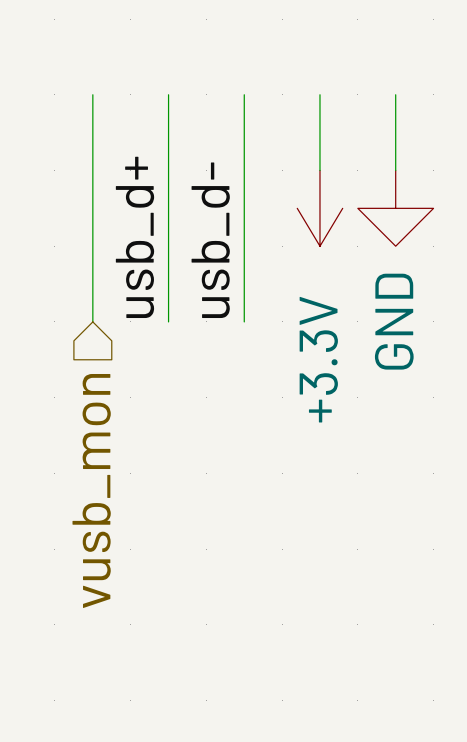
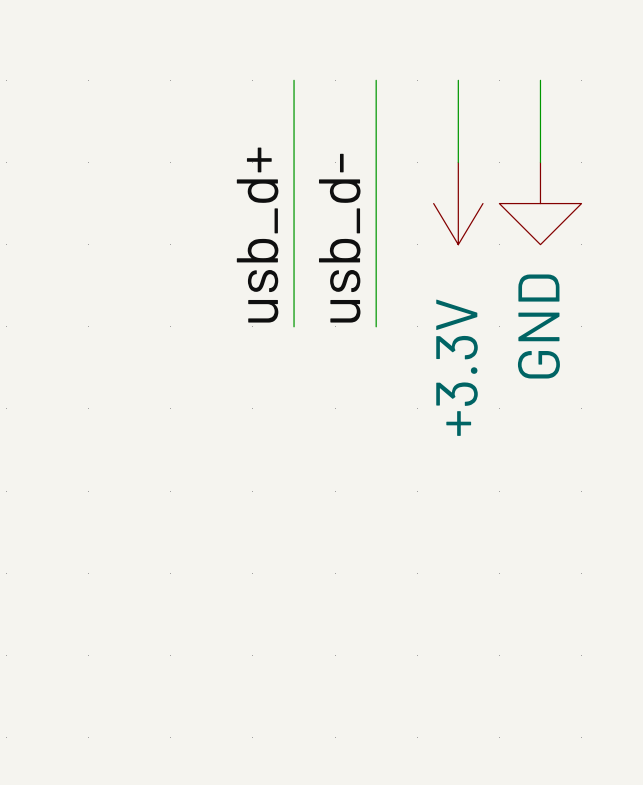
wire: (92, 94) (92, 321) -> none
hierarchical label: vusb_mon (91, 491) -> none

